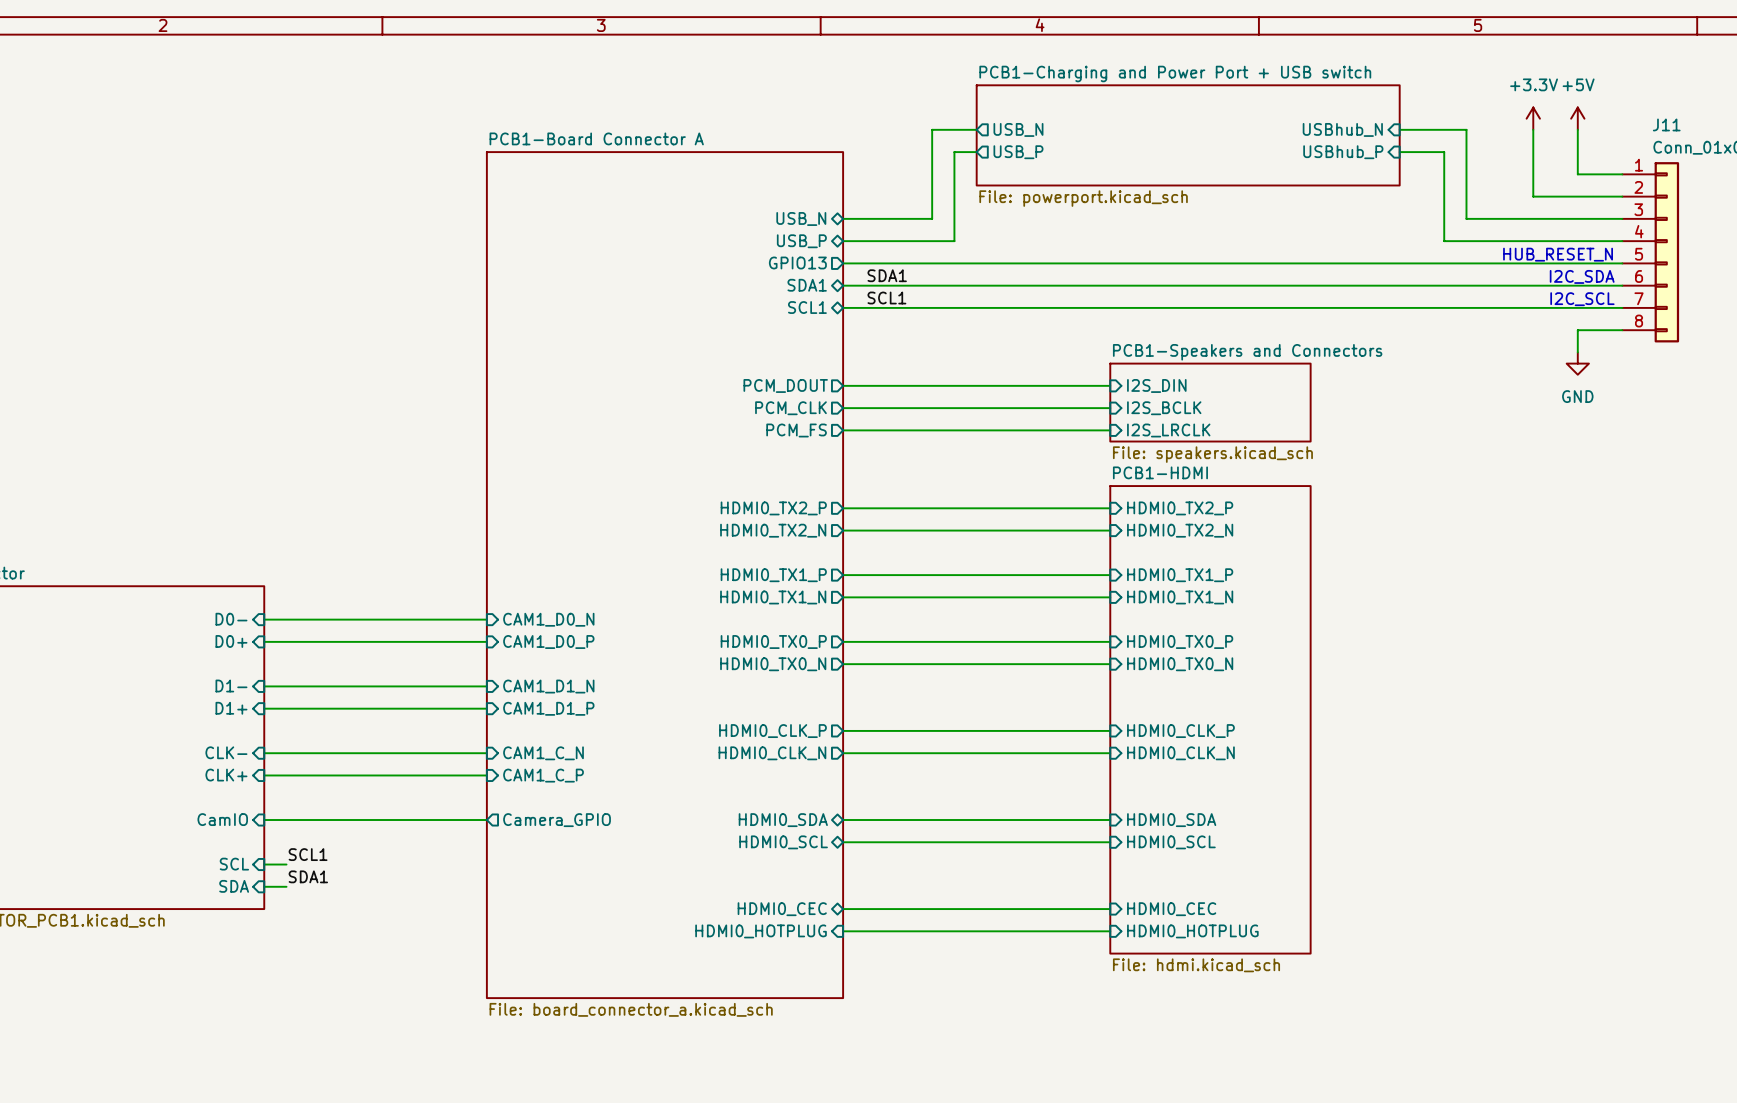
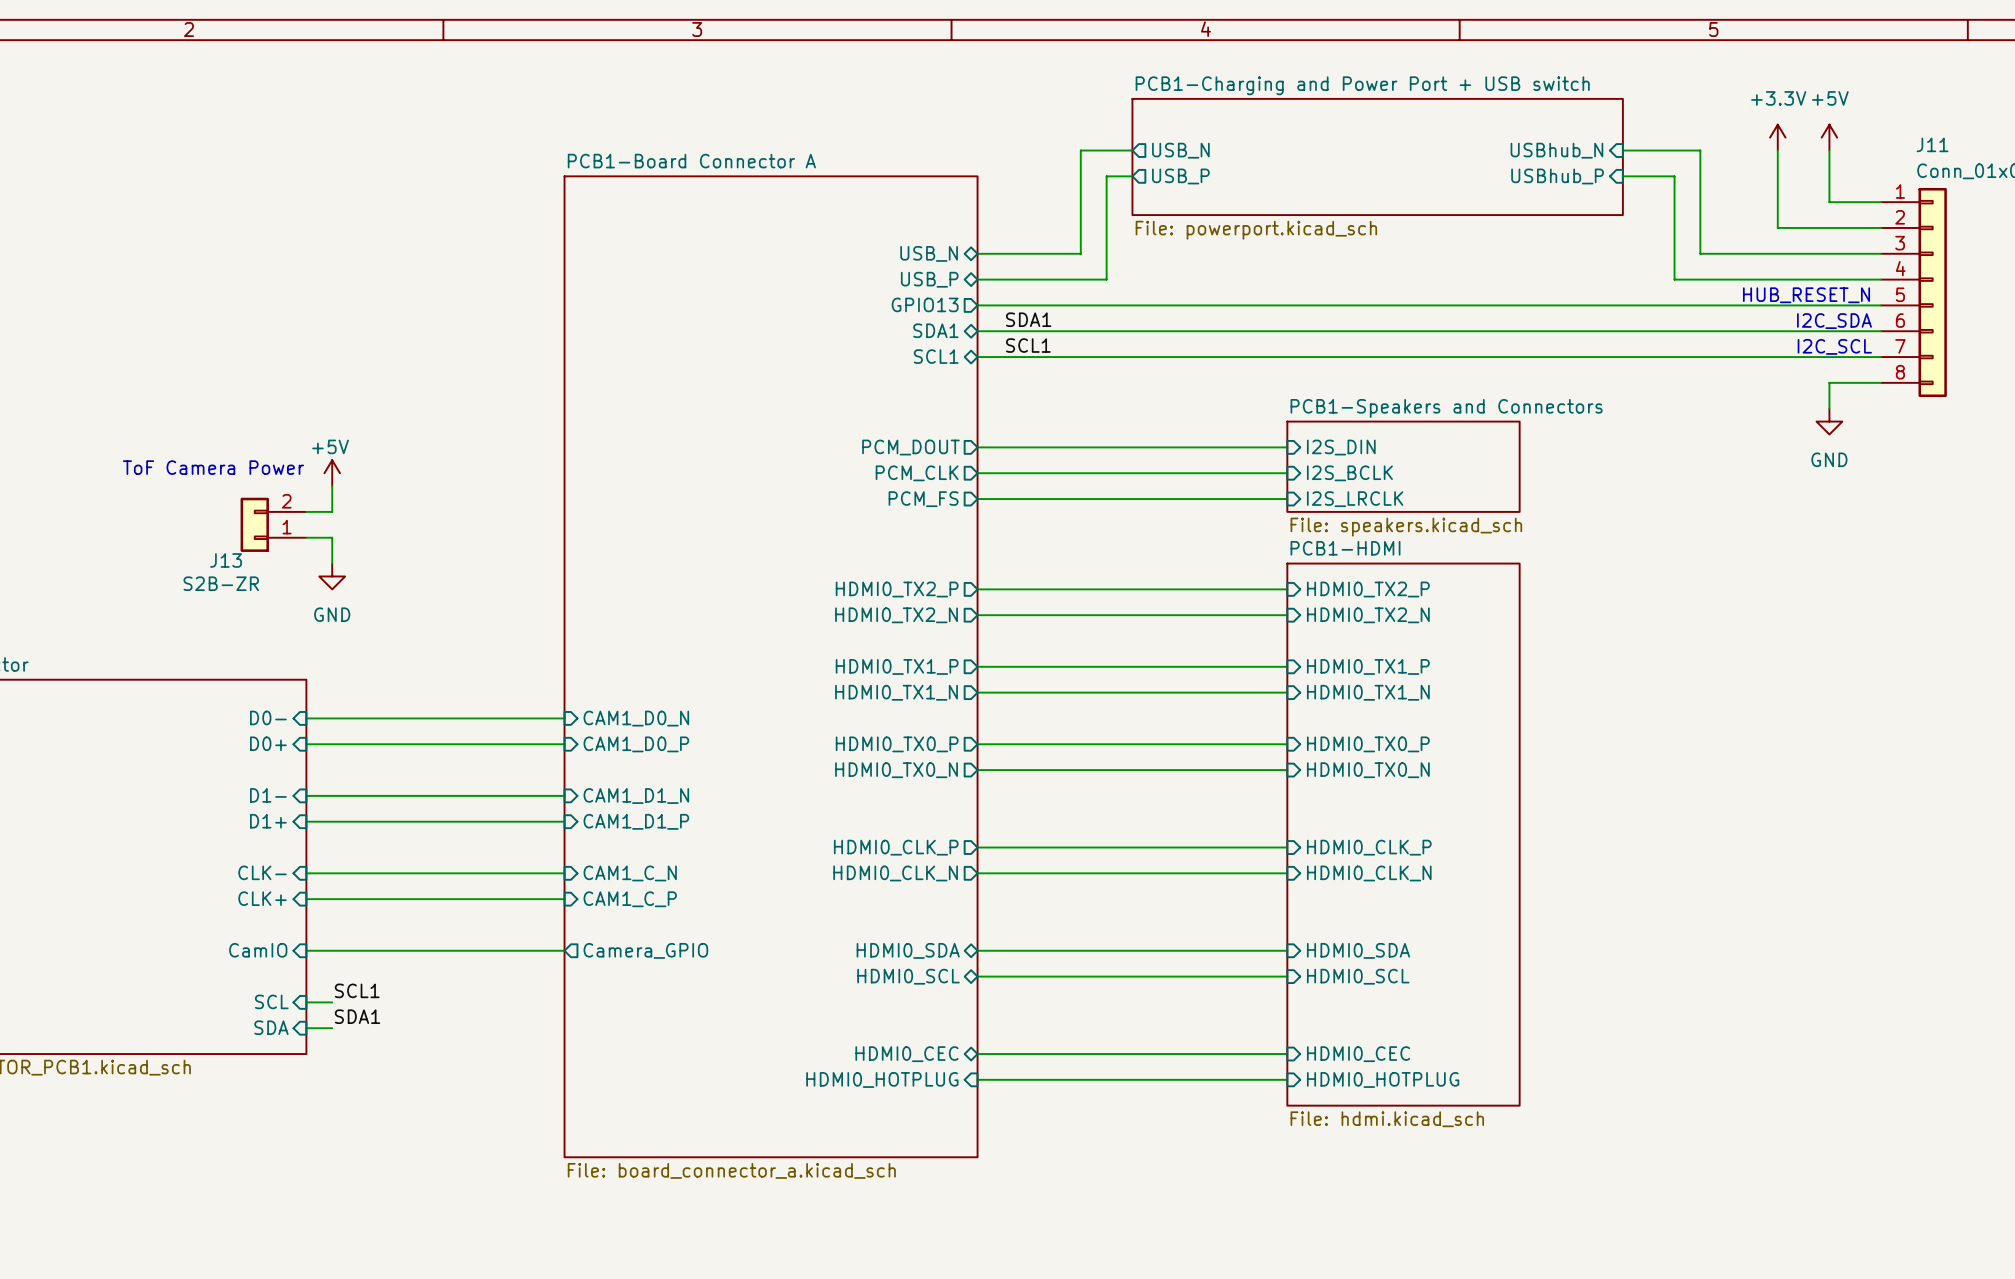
text: none -> ToF Camera Power (213, 467)
power symbol: none -> +5V (332, 473)
wire: none -> (332, 486) (332, 511) (306, 511)
J13: none -> S2B-ZR (273, 524)
wire: none -> (306, 537) (332, 537) (332, 563)
power symbol: none -> GND (332, 576)

